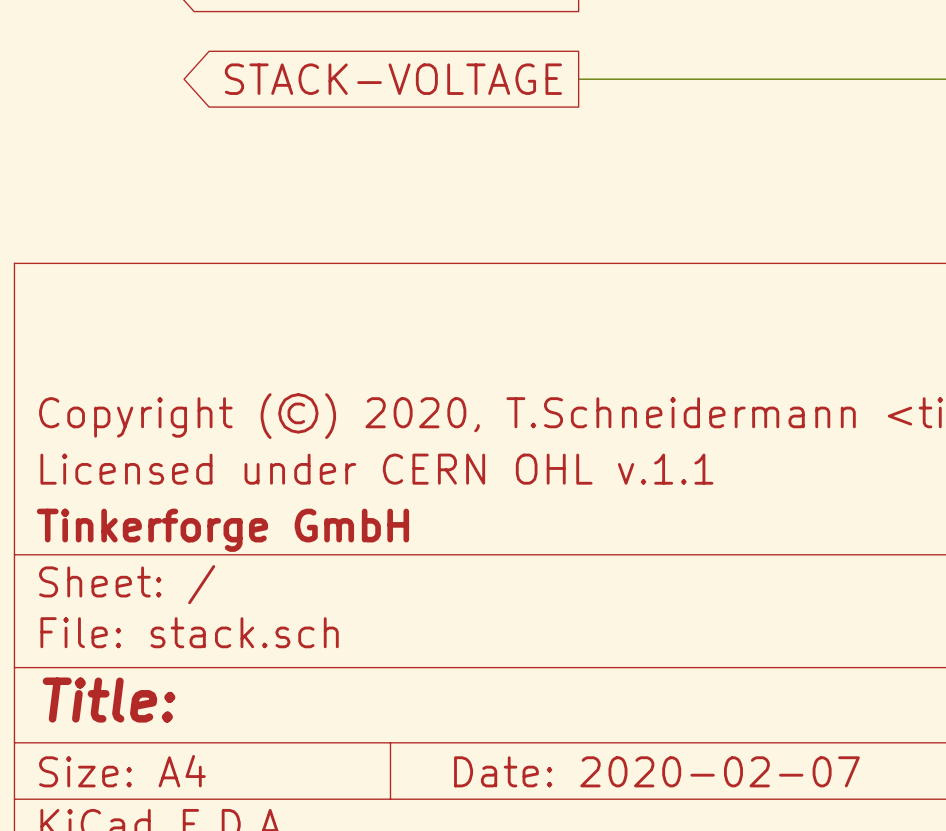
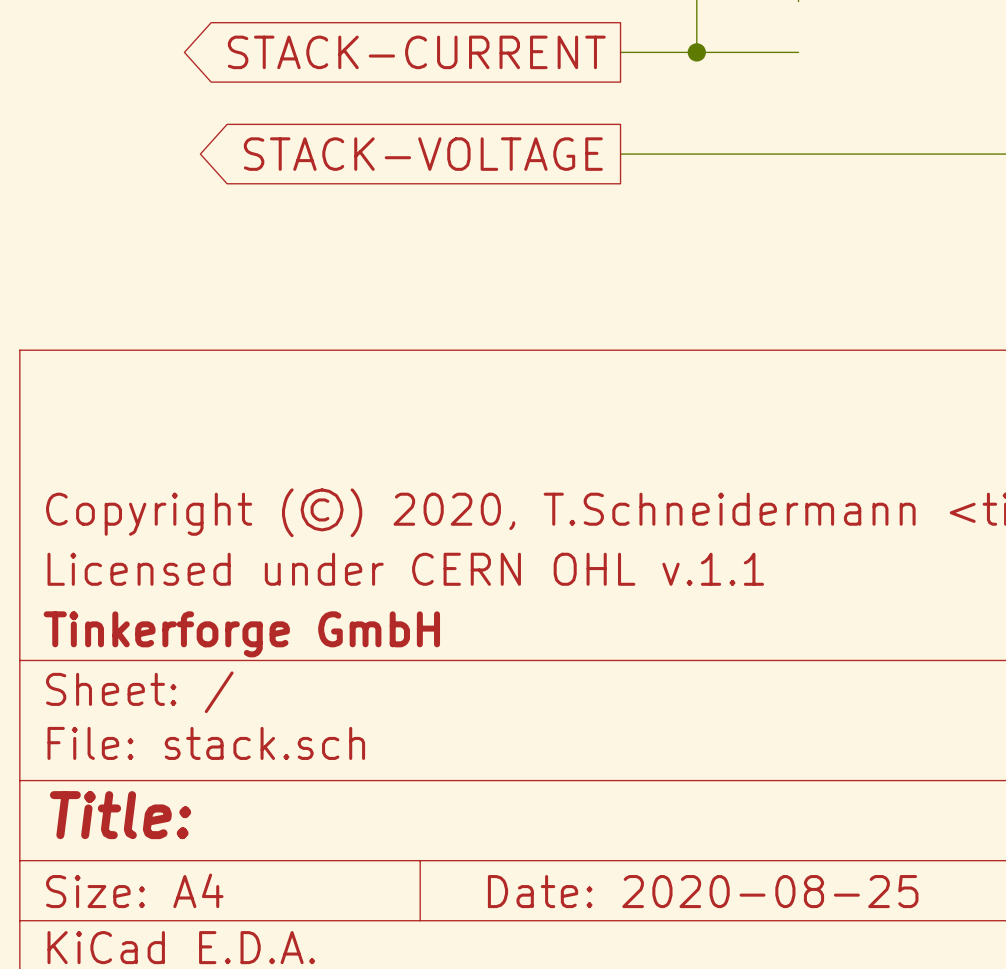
title block: Date: 2020-02-07 (656, 771) -> Date: 2020-08-25 (703, 891)

